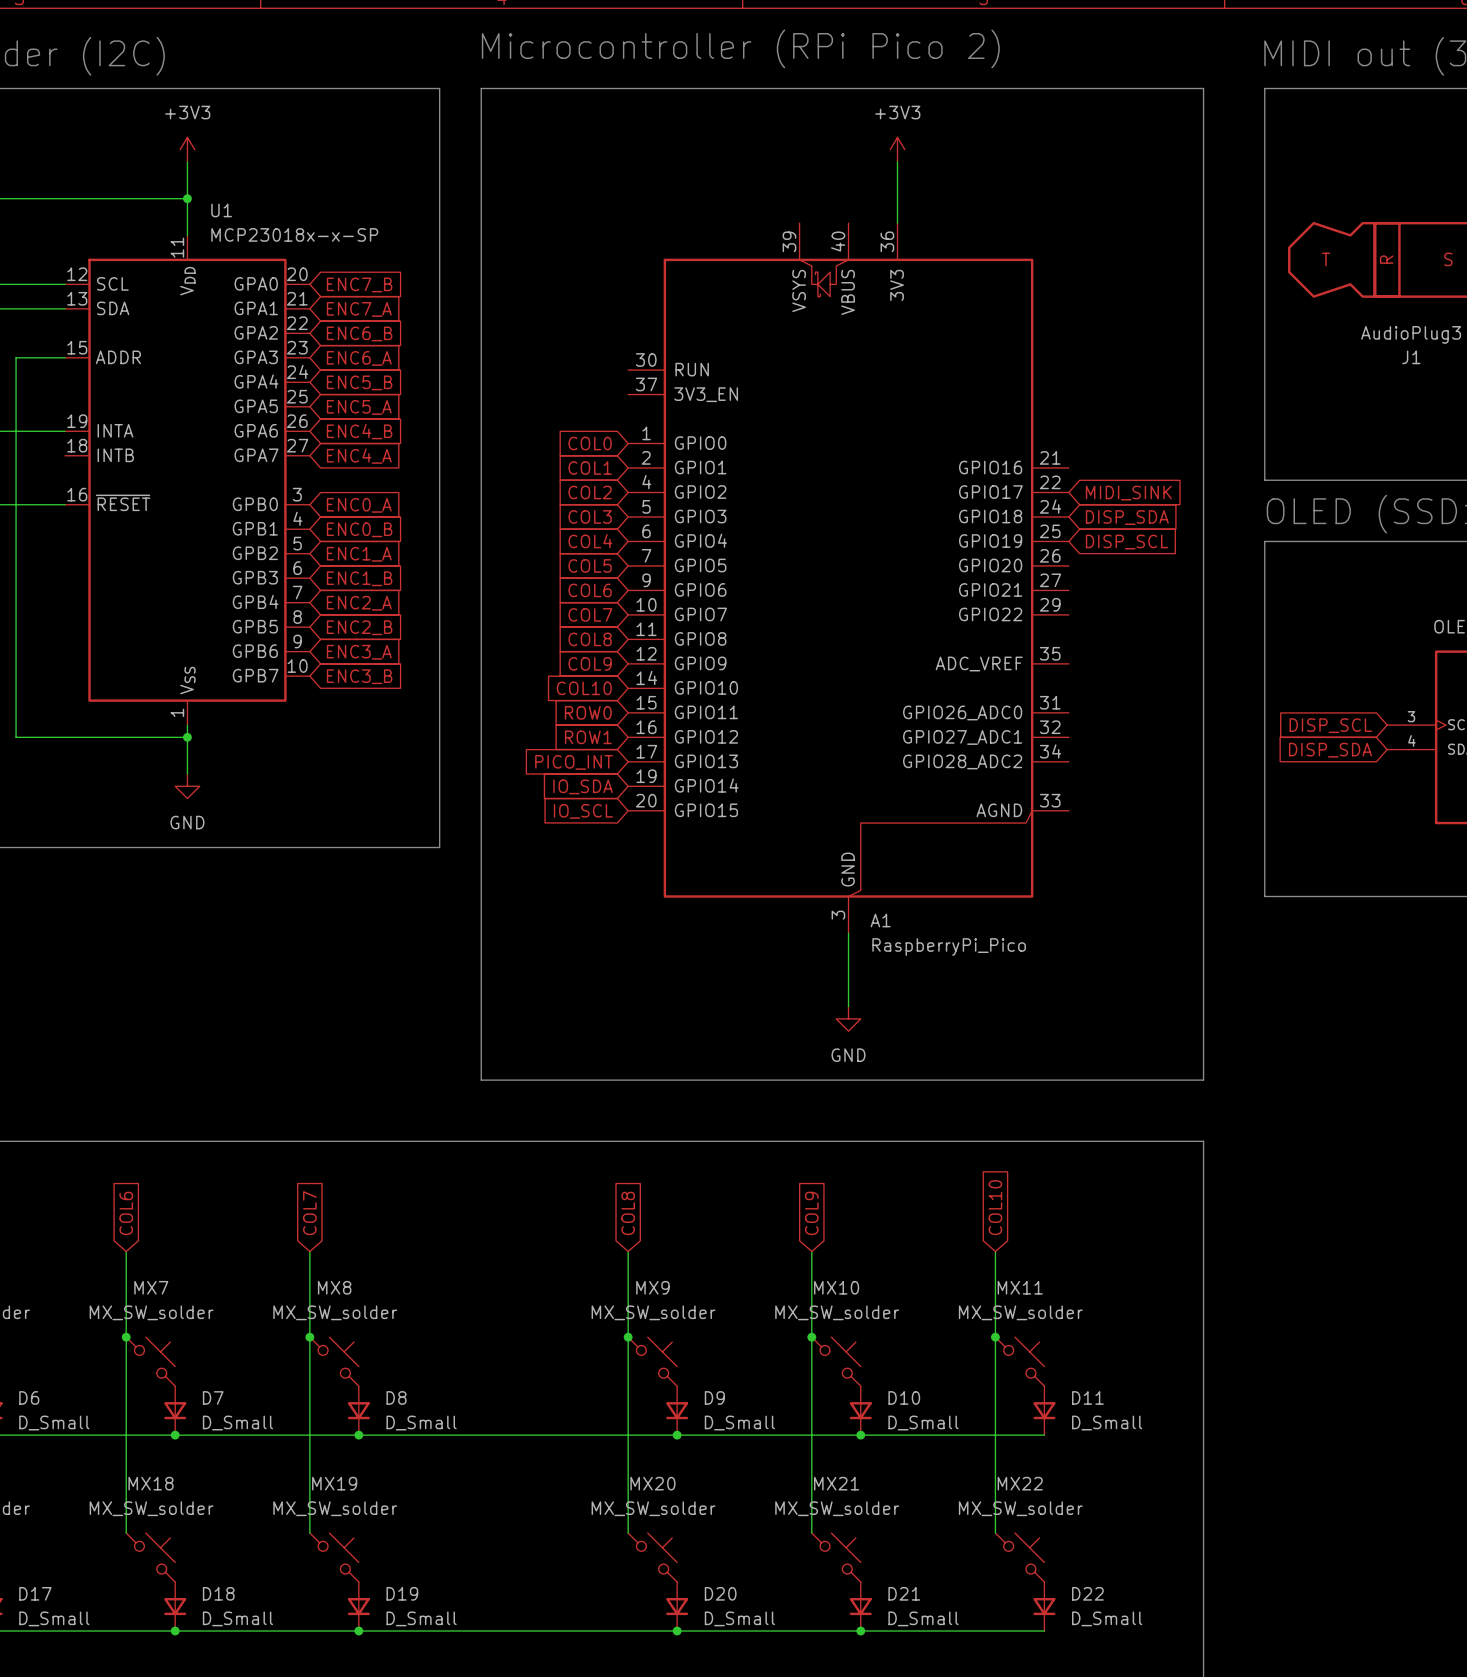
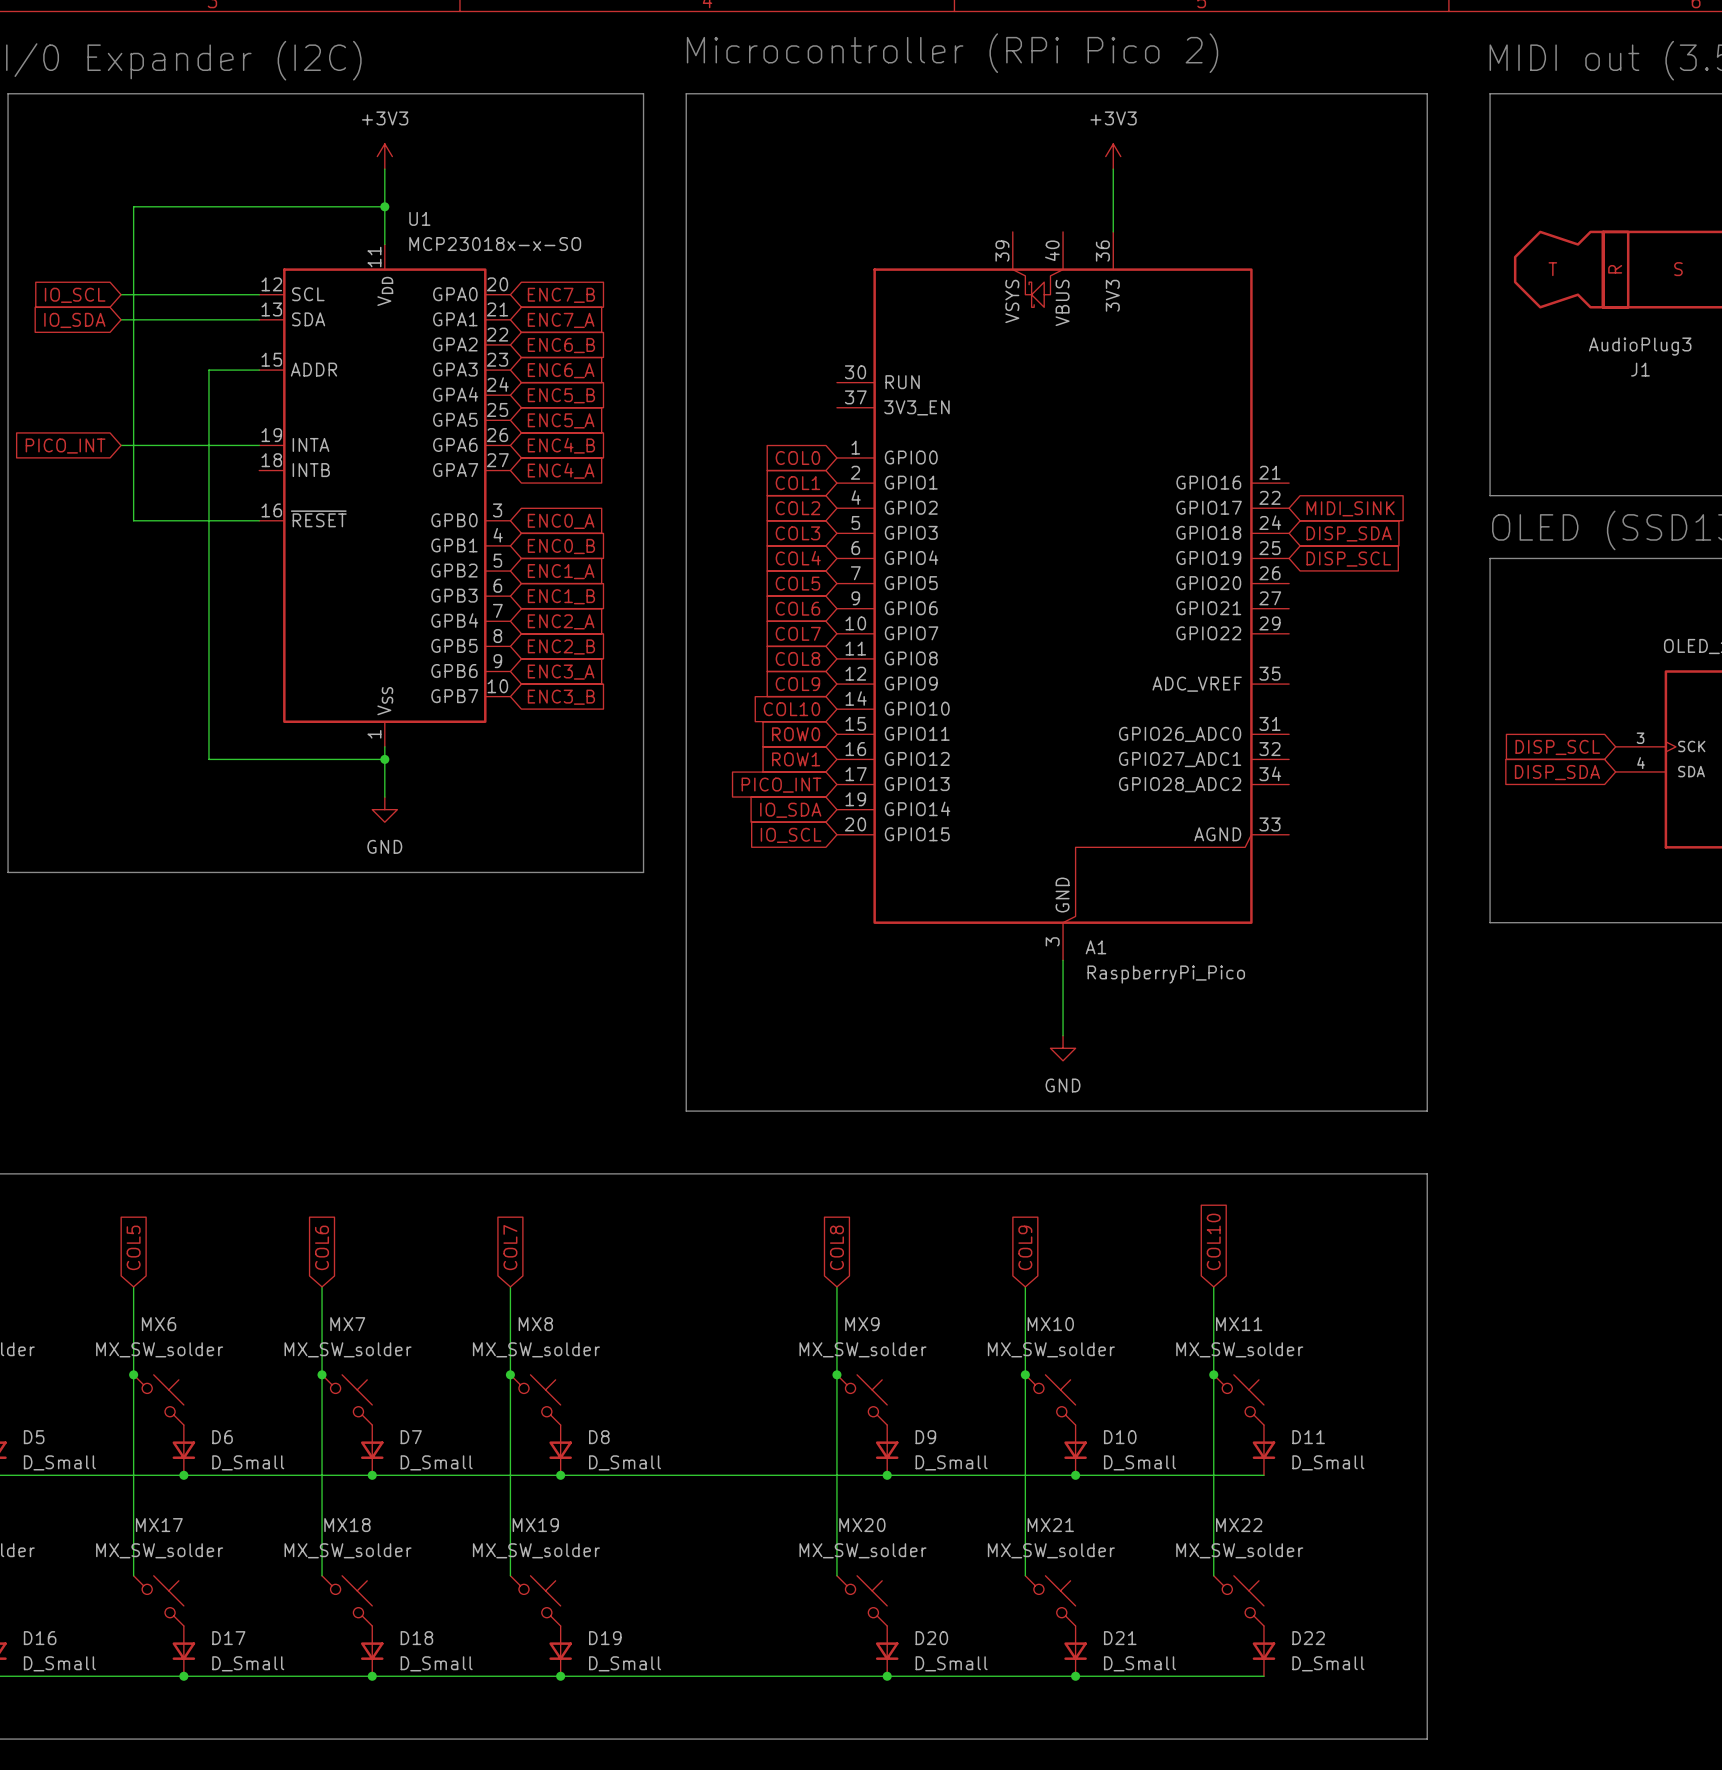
U1 value: MCP23018x-x-SP (294, 234) -> MCP23018x-x-SO (495, 244)

